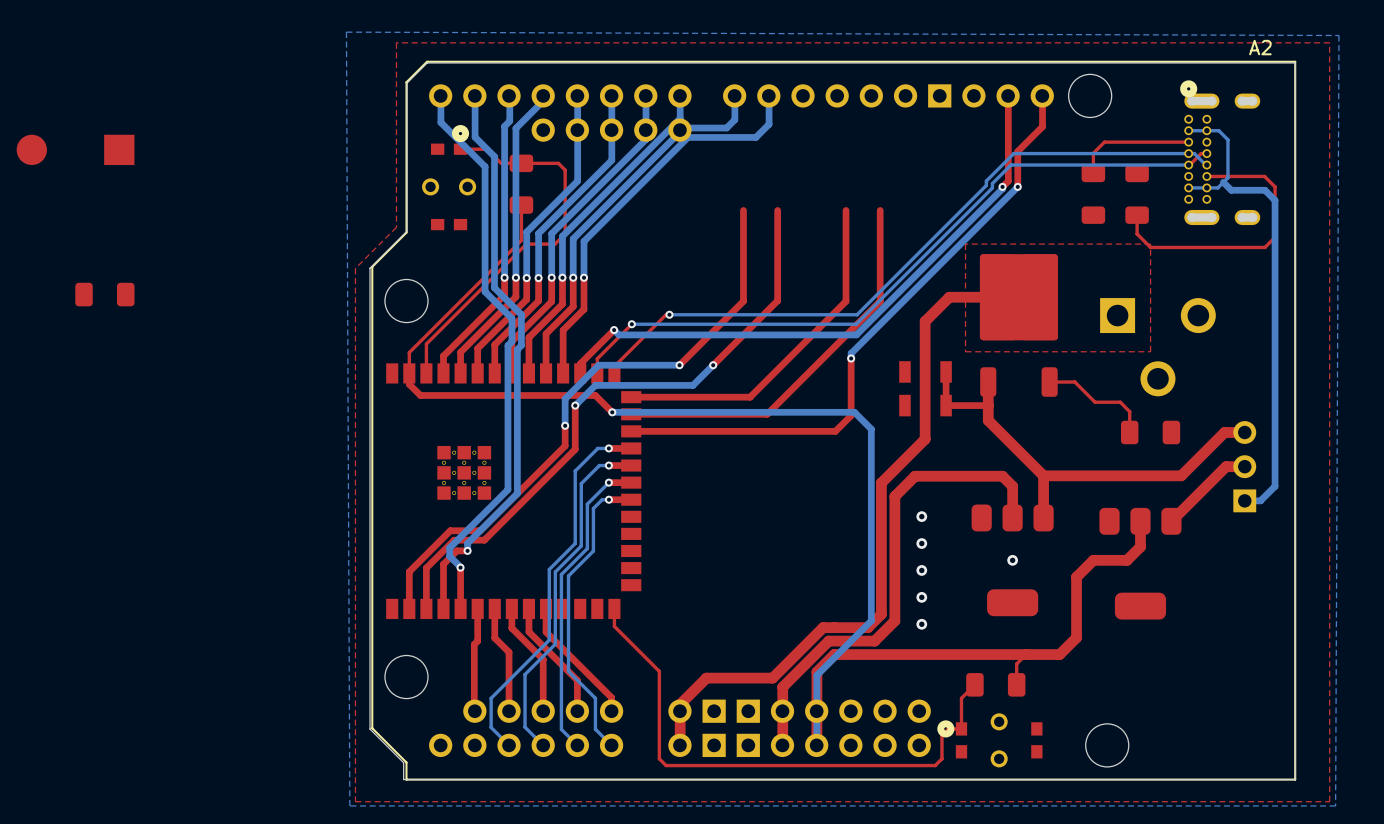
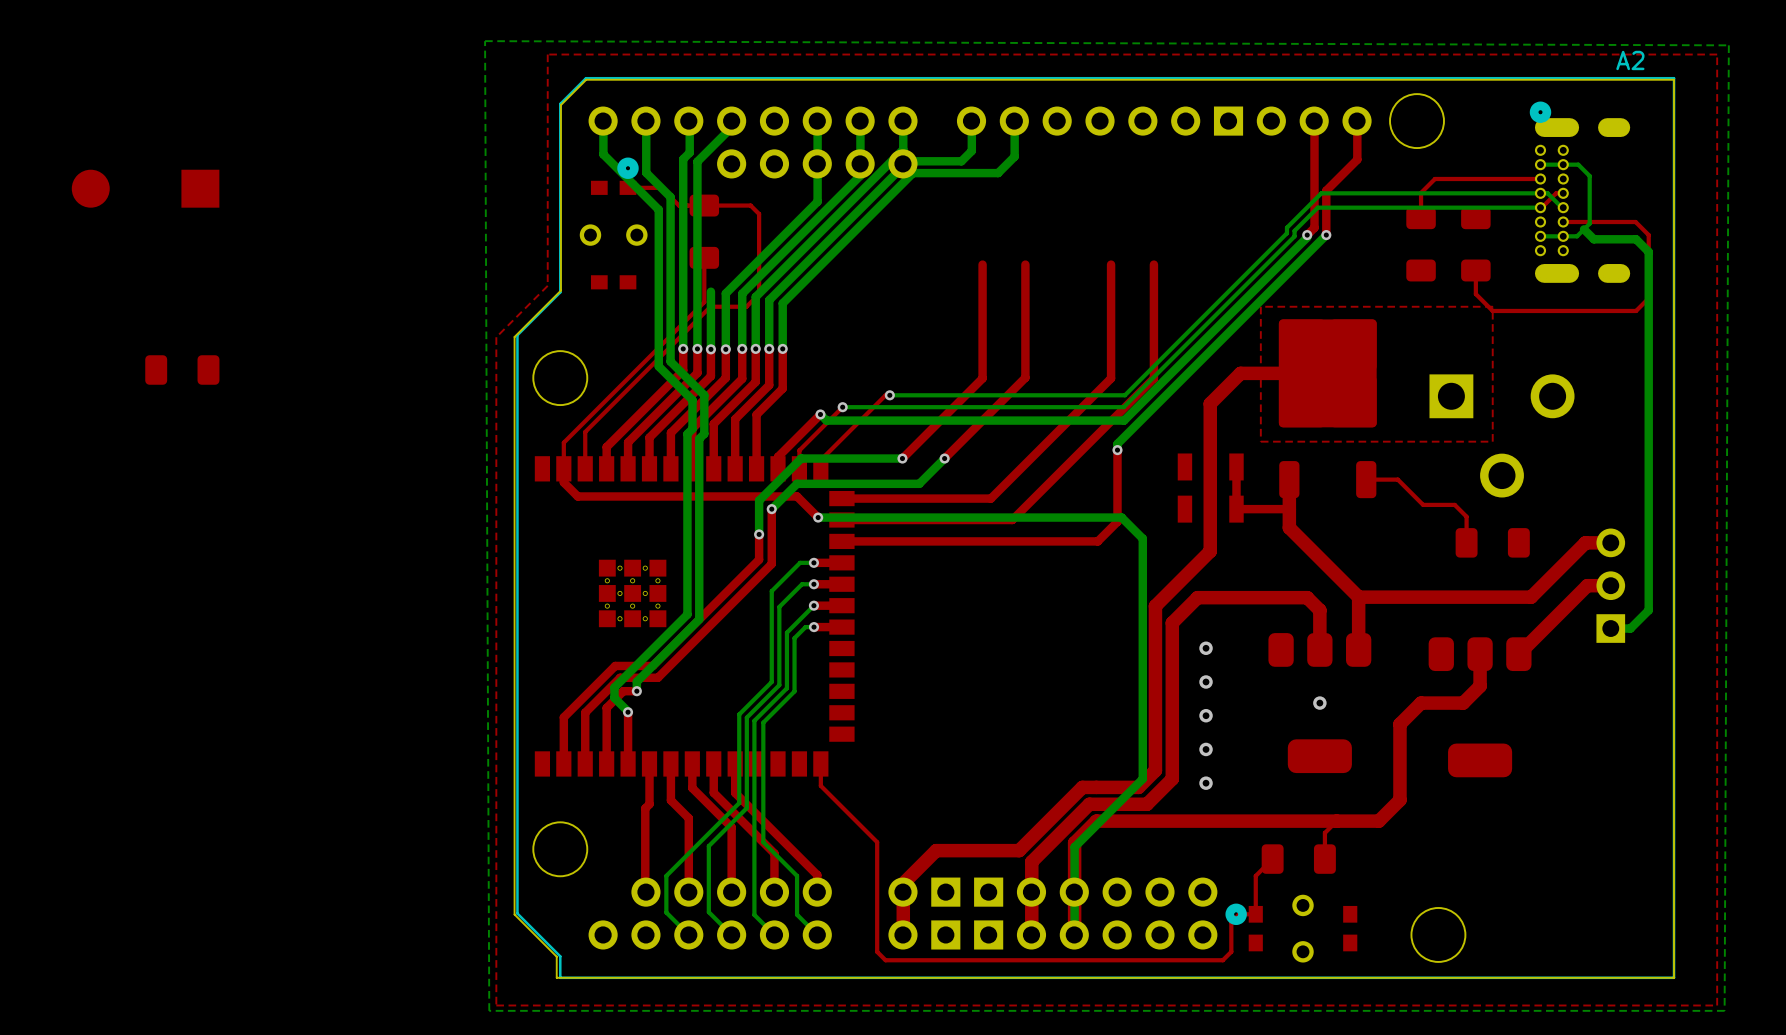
bottom track: (577, 97) (577, 181) (526, 232) -> none

